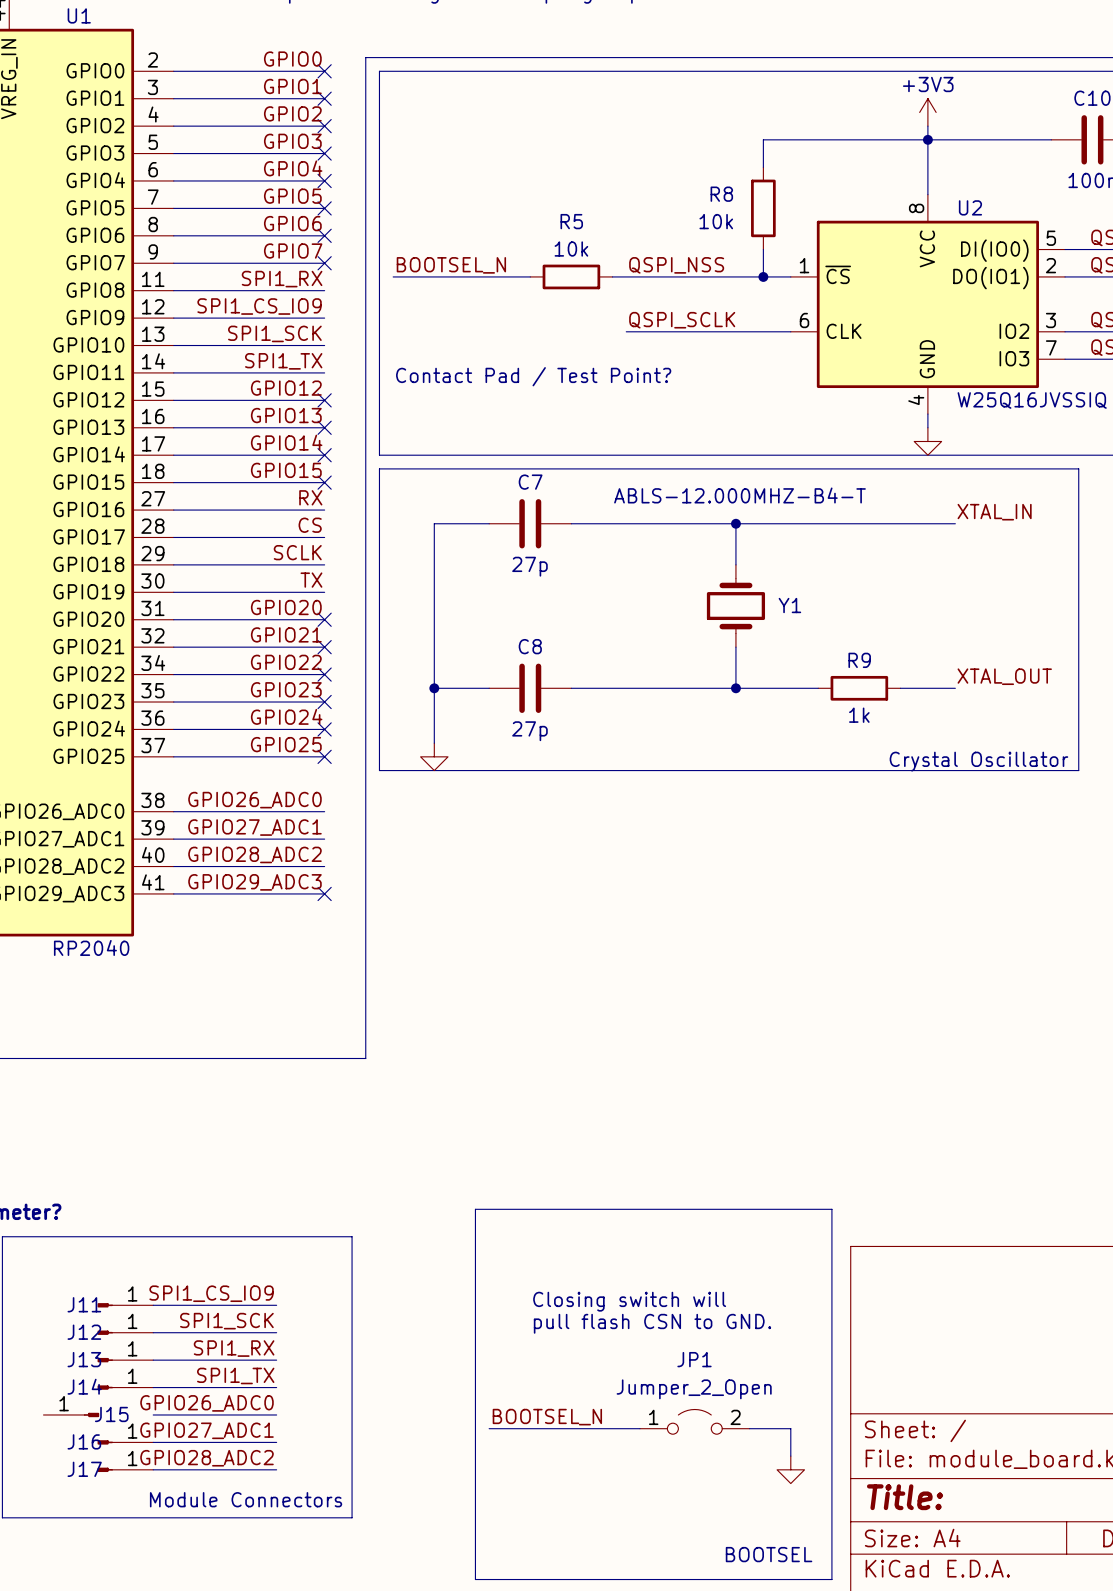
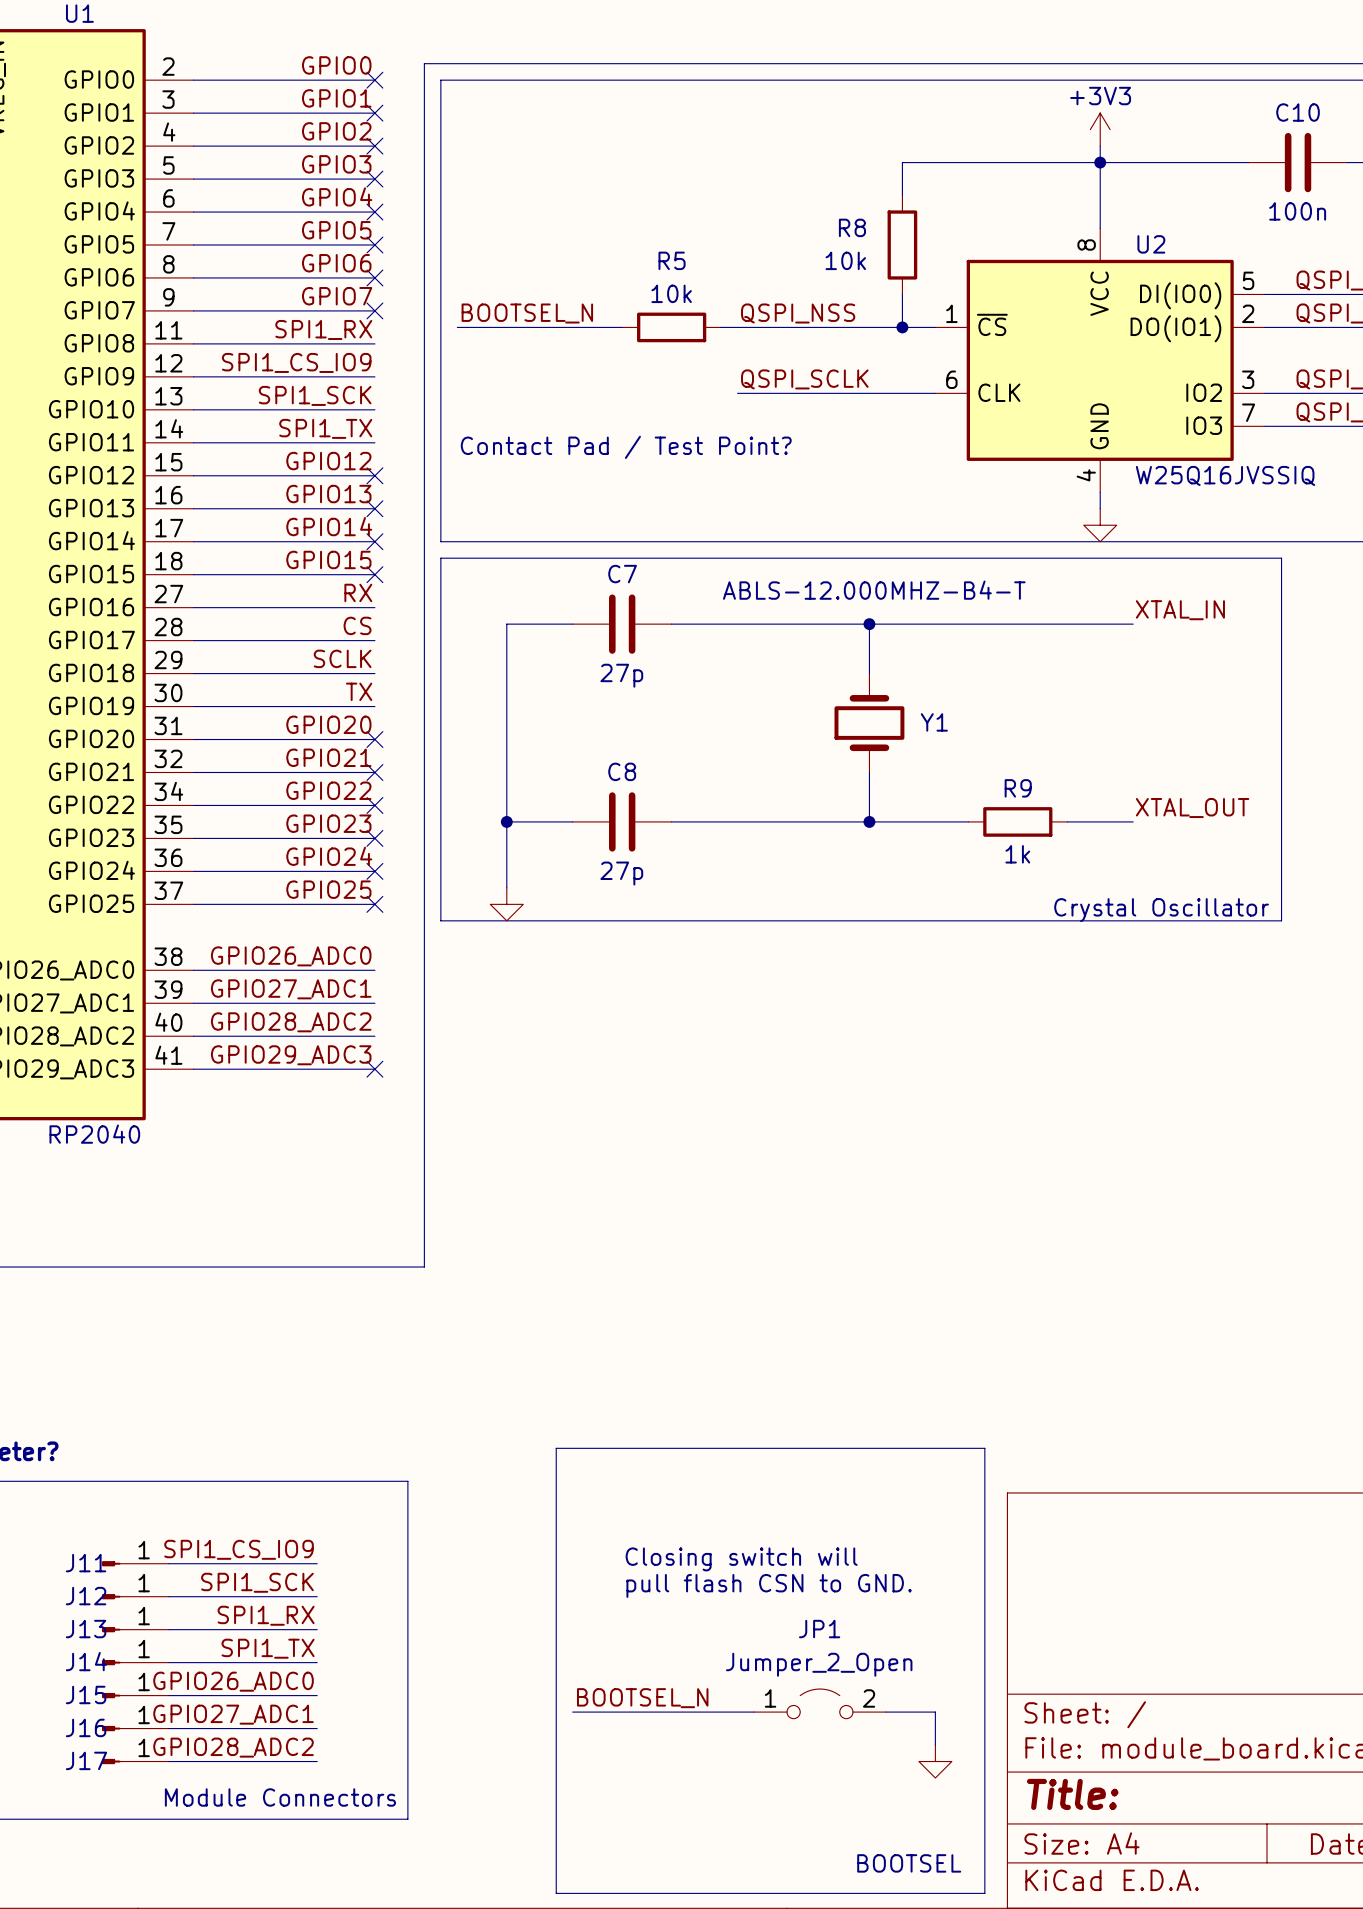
J15 position: (71, 1414) -> (135, 1695)
J15 rotation: 0° (91, 1414) -> 180° (111, 1695)

